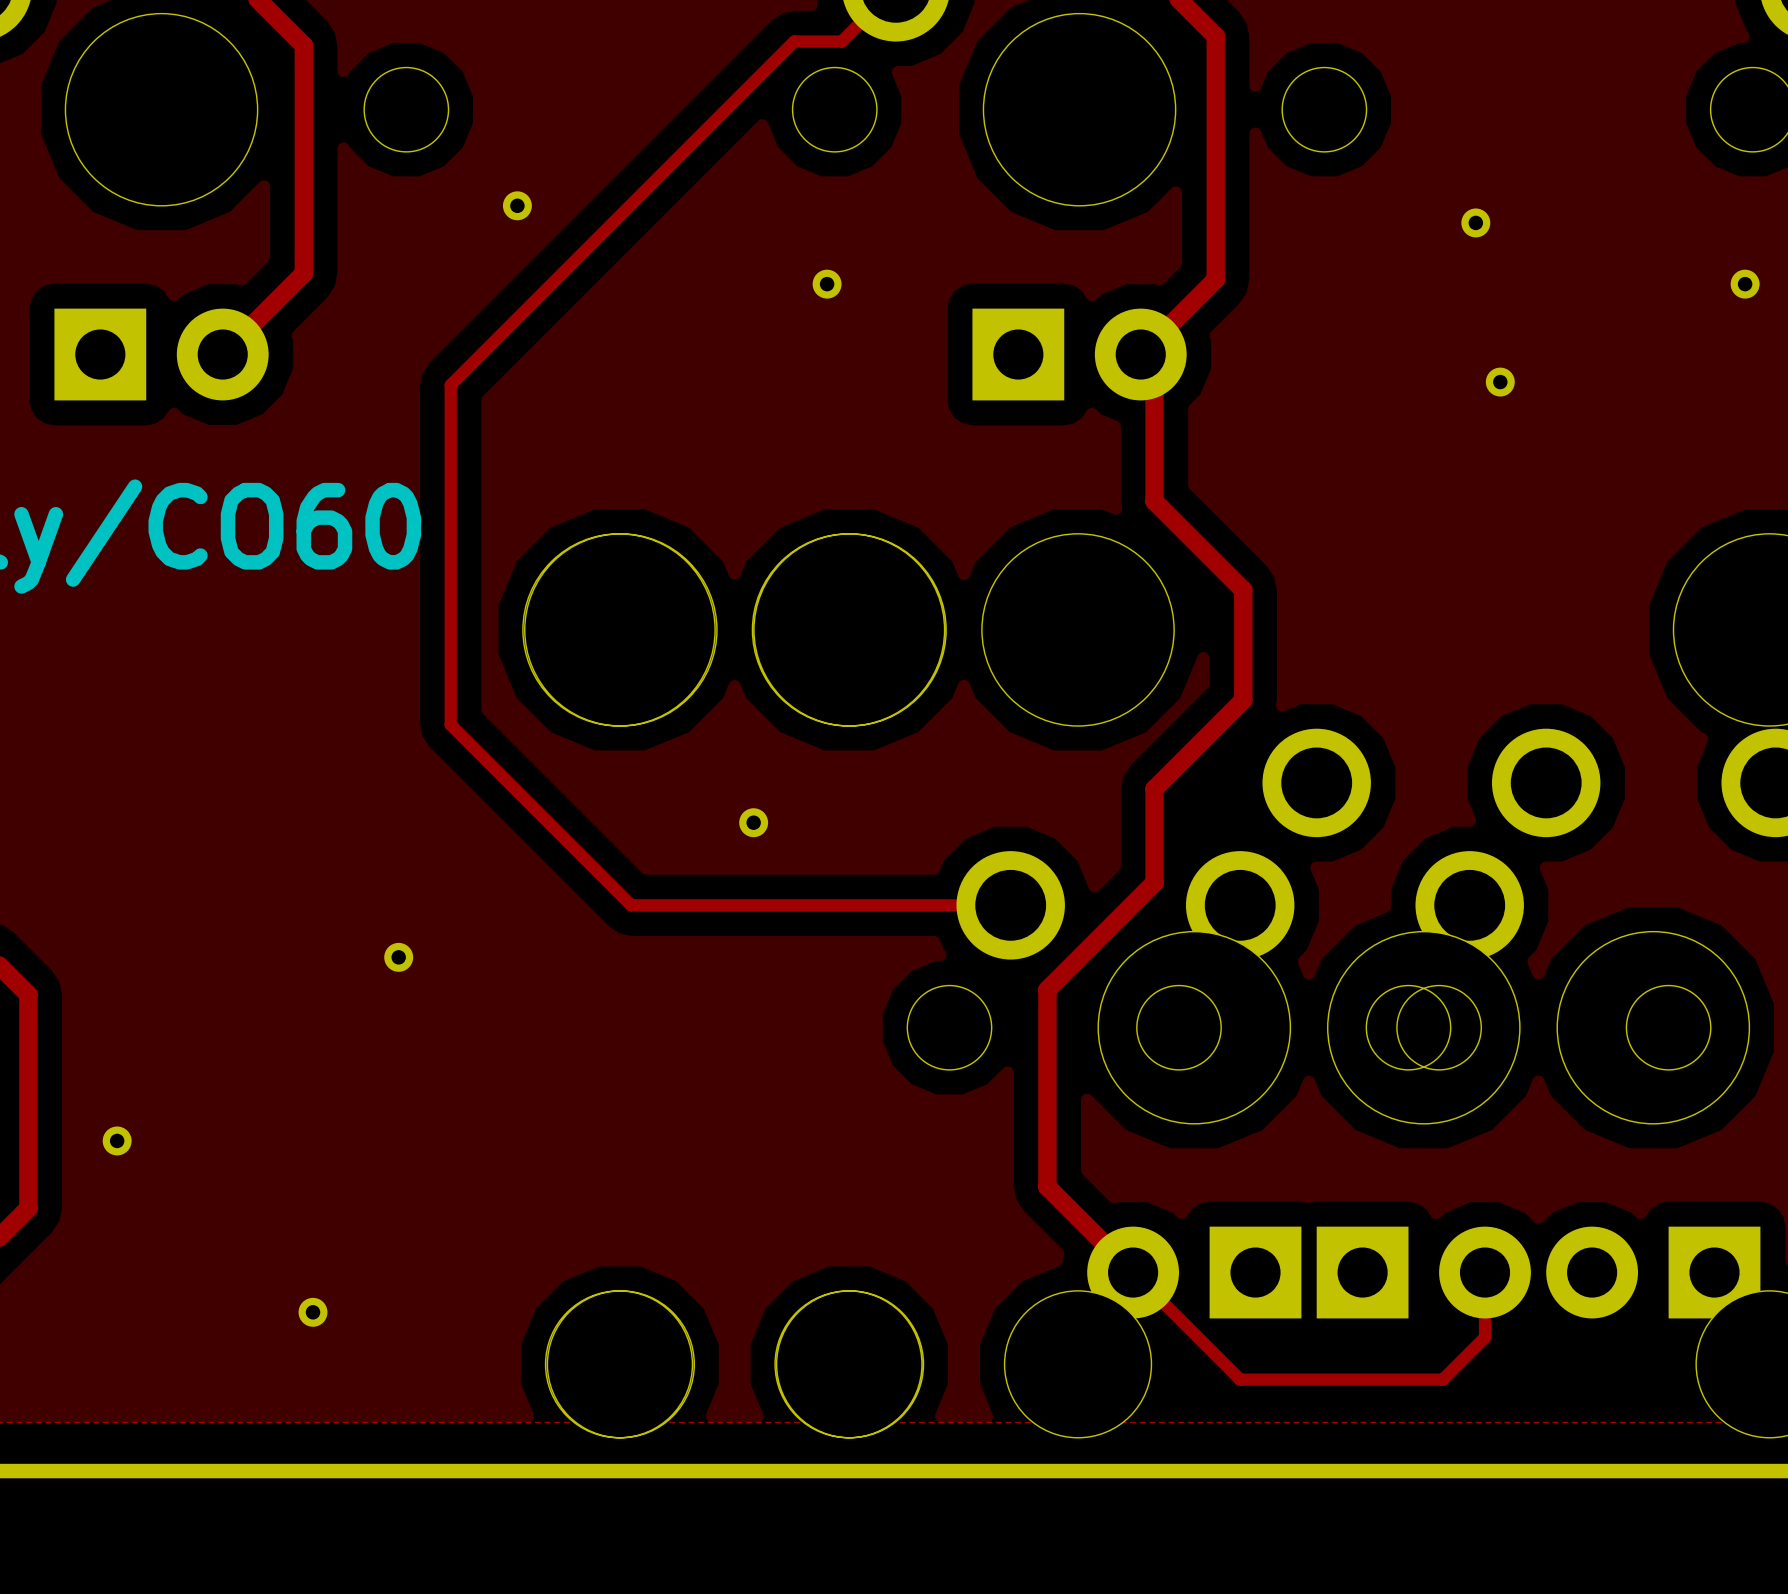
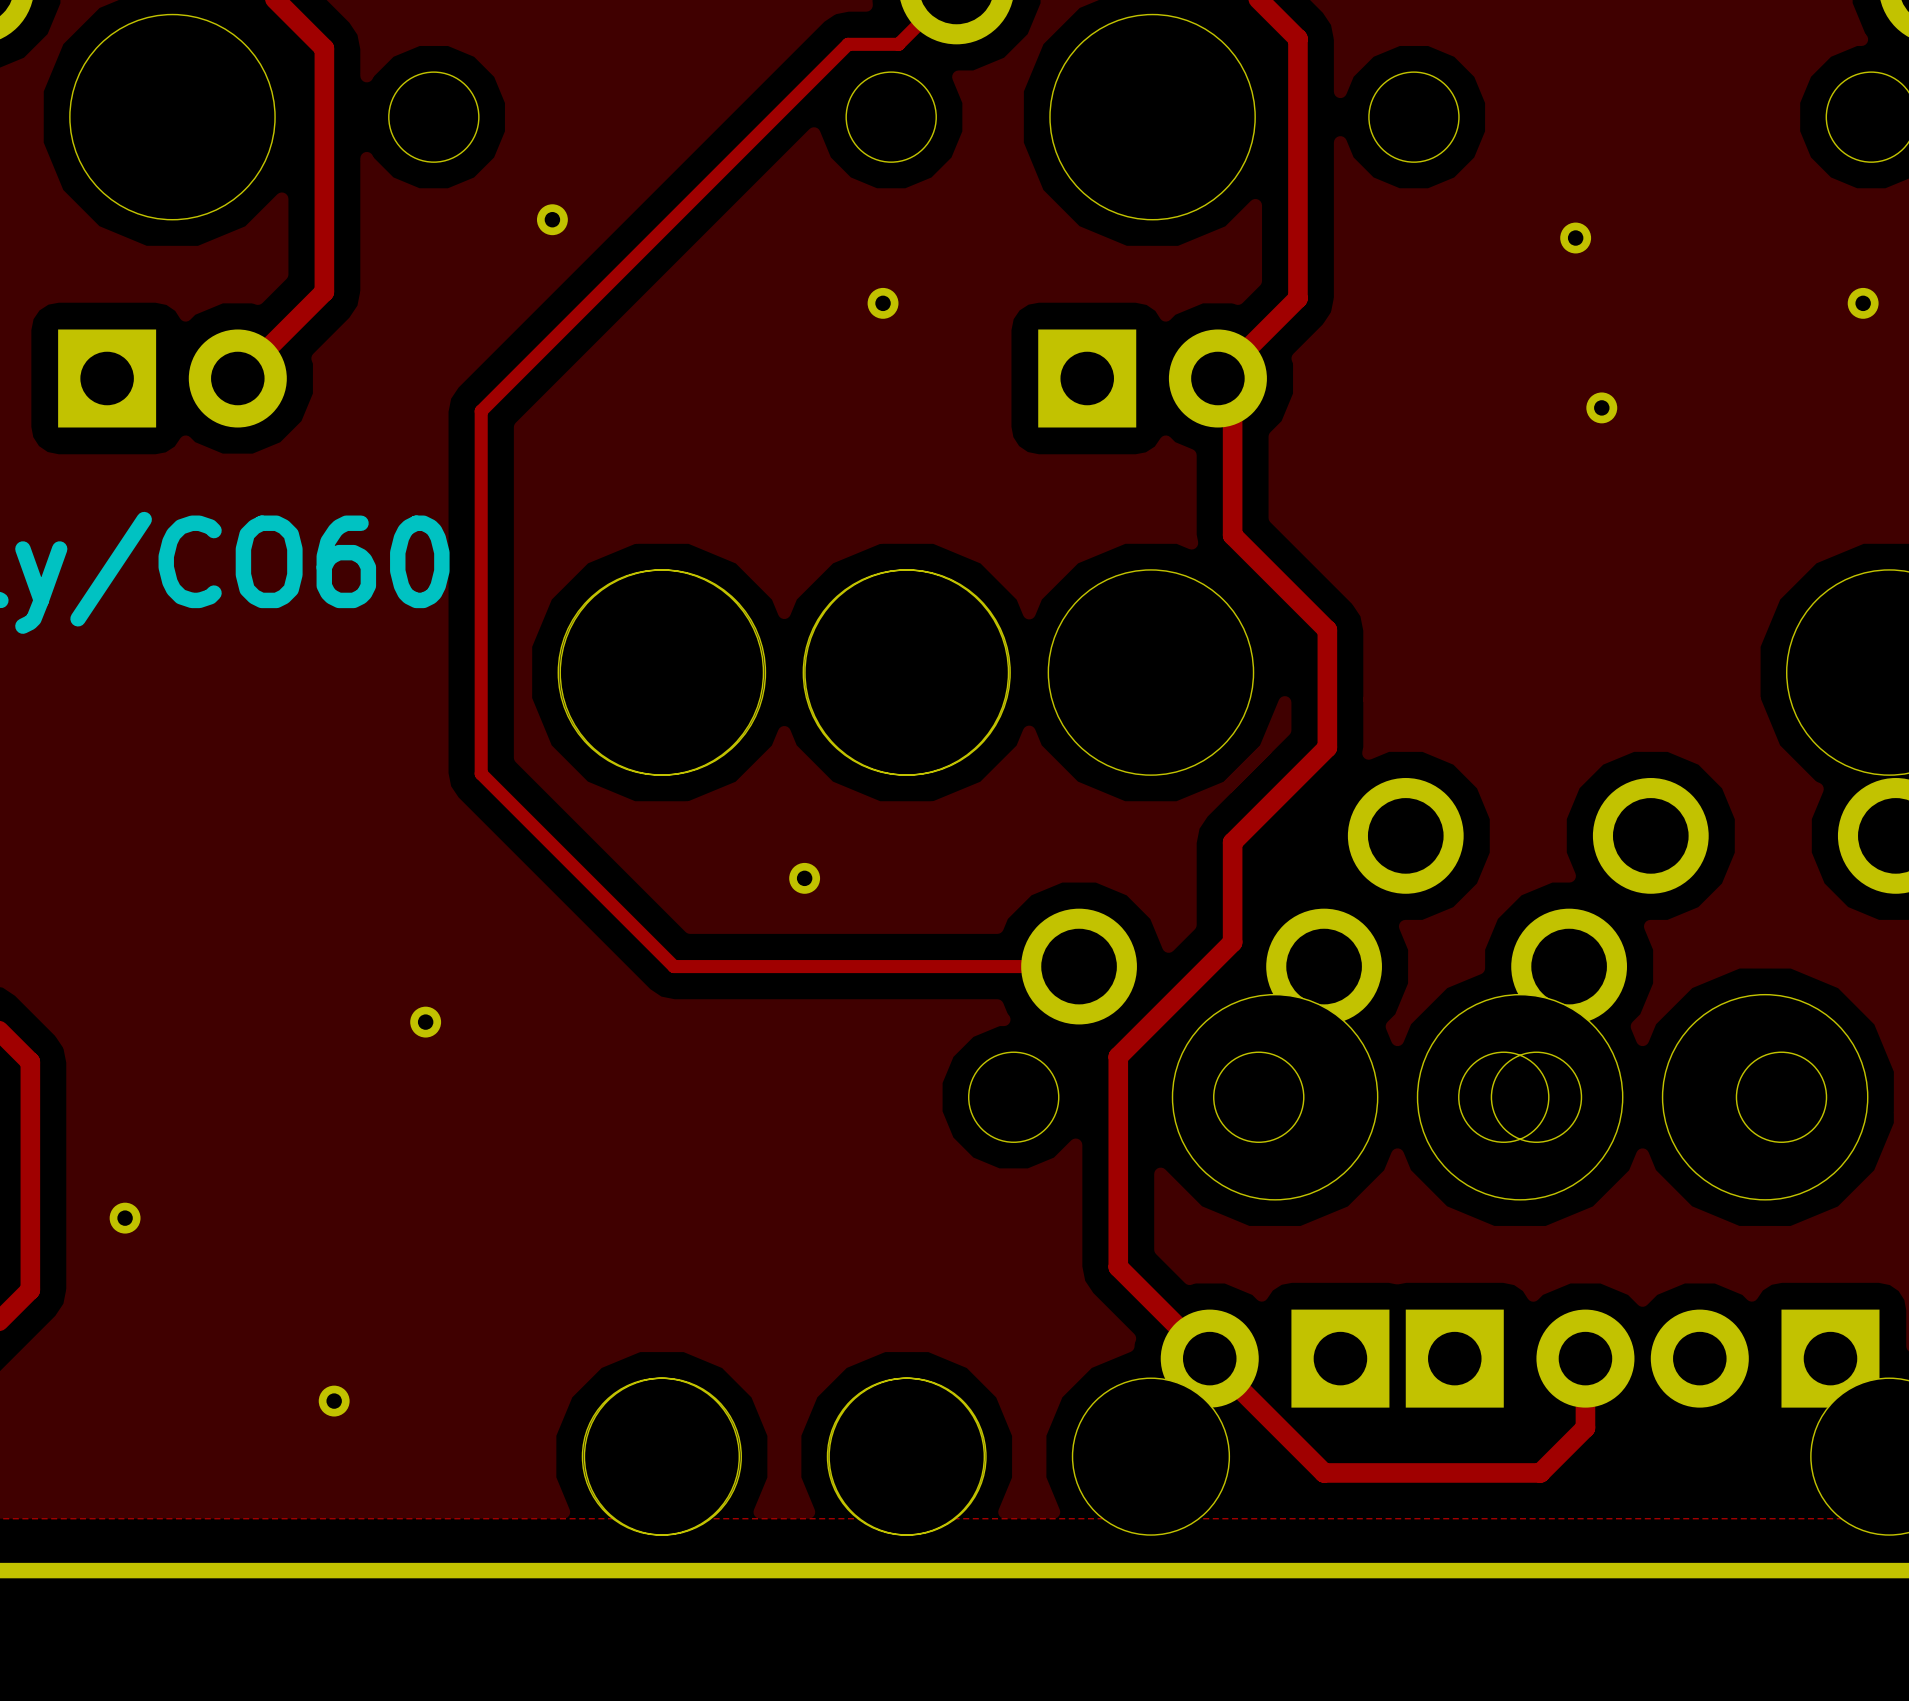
track width: thin (1133, 1272) (1240, 1379) (1442, 1379) (1485, 1337) (1485, 1272) -> thick (1209, 1358) (1324, 1472) (1540, 1472) (1585, 1427) (1585, 1358)

